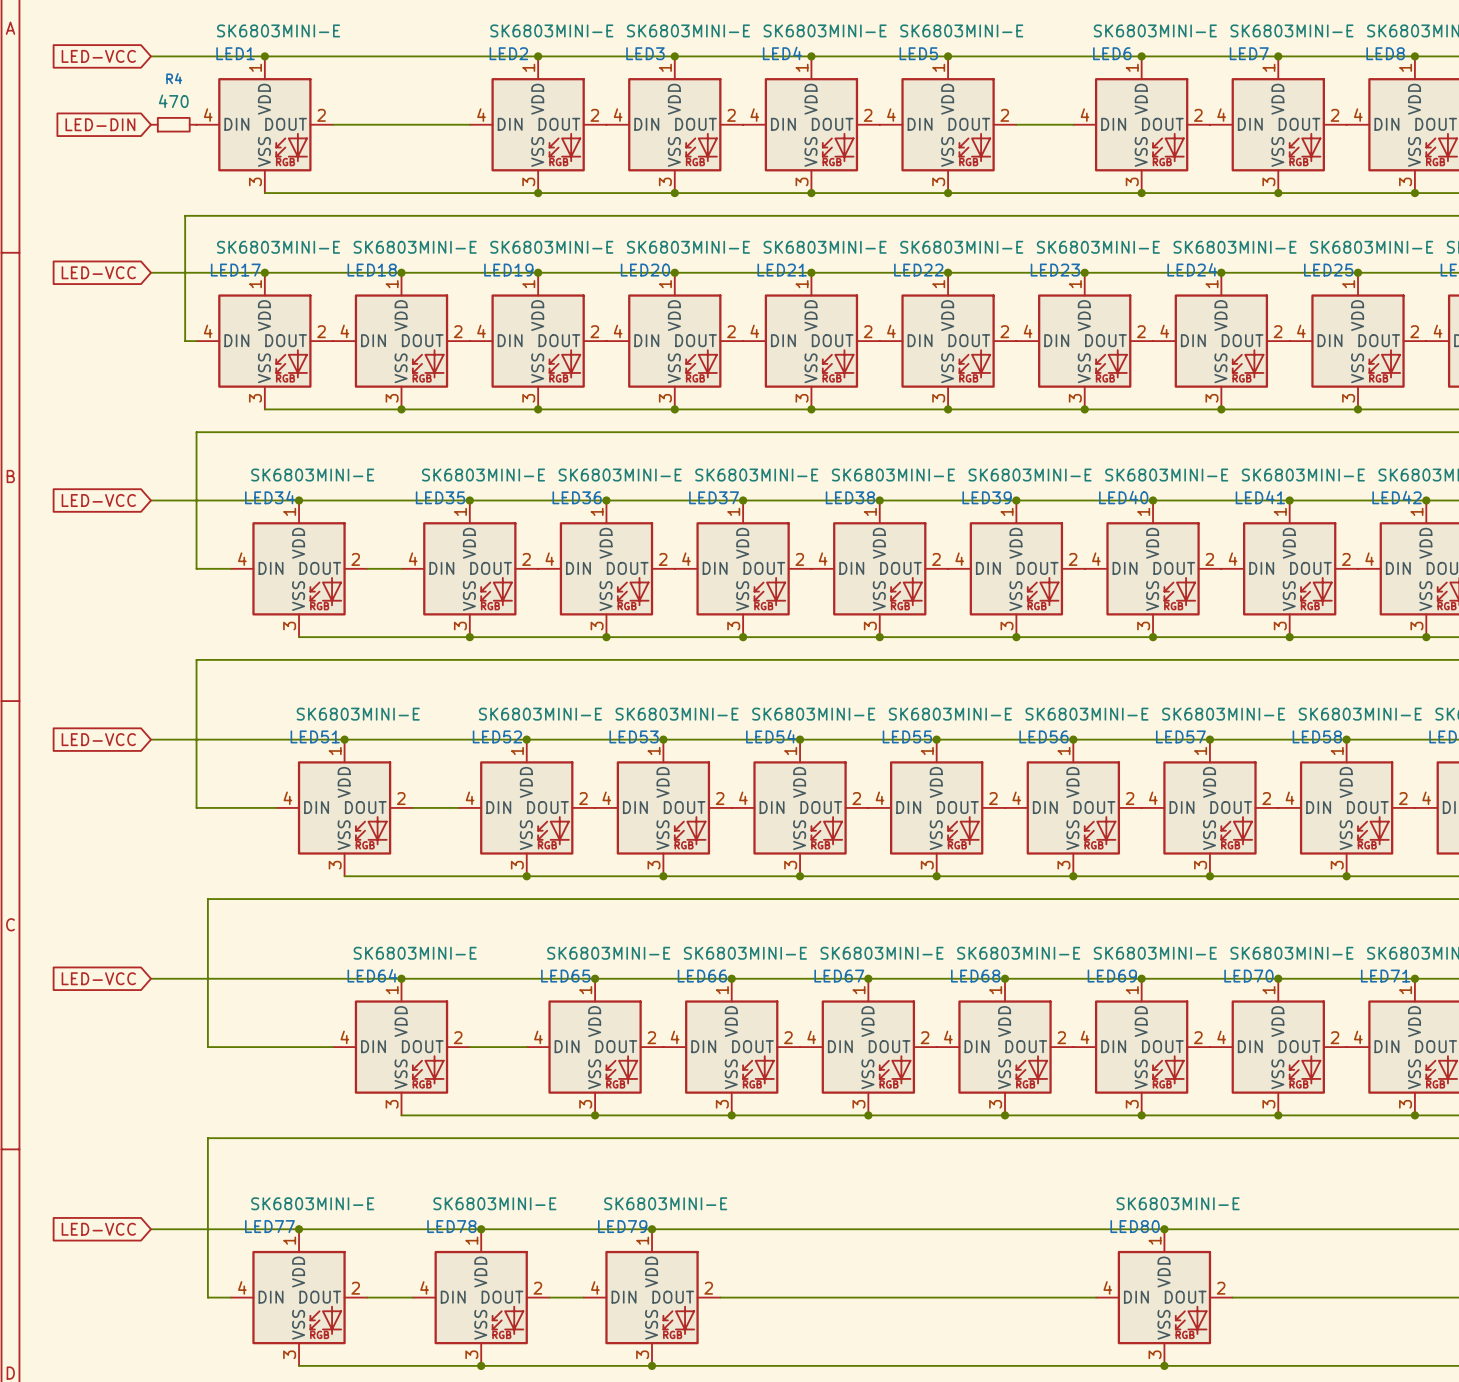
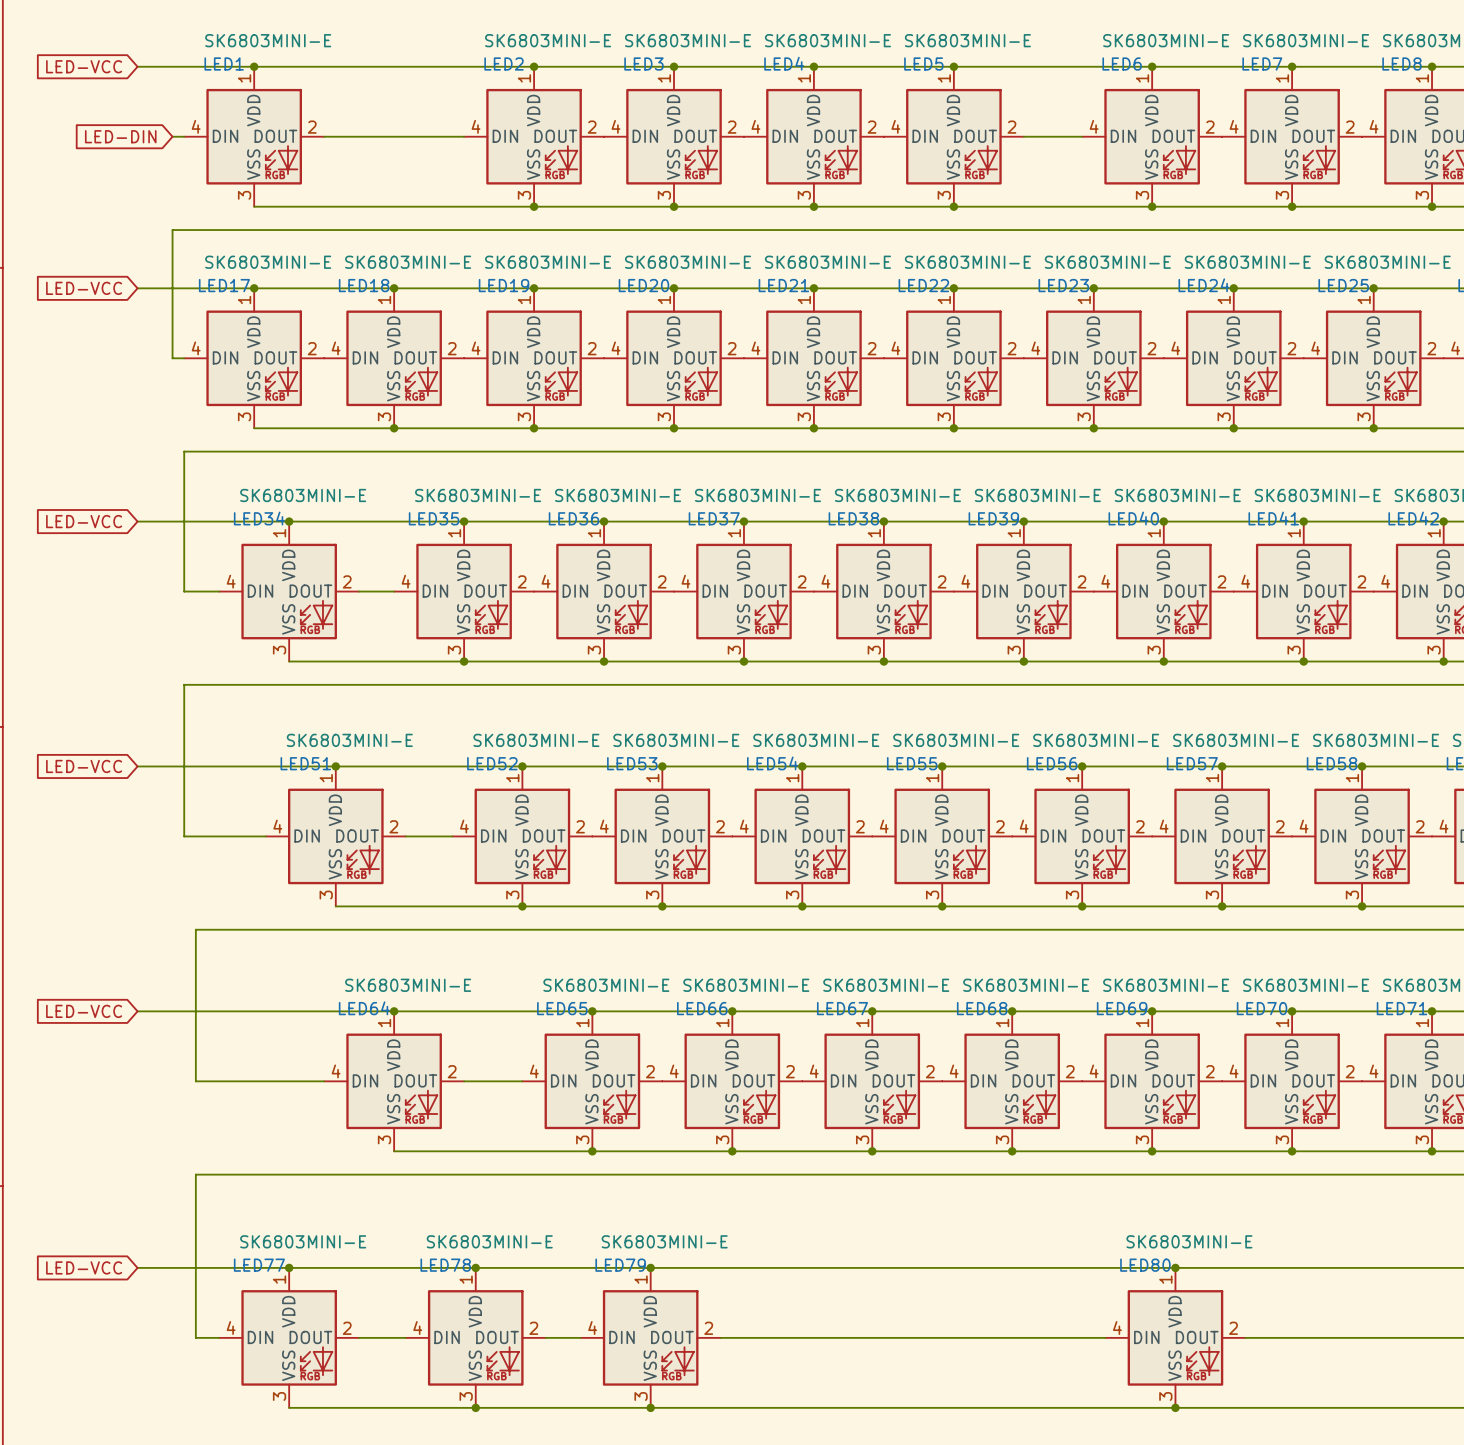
global label position: LED-DIN (100, 124) -> LED-DIN (120, 136)
R4: 470 (173, 124) -> none

